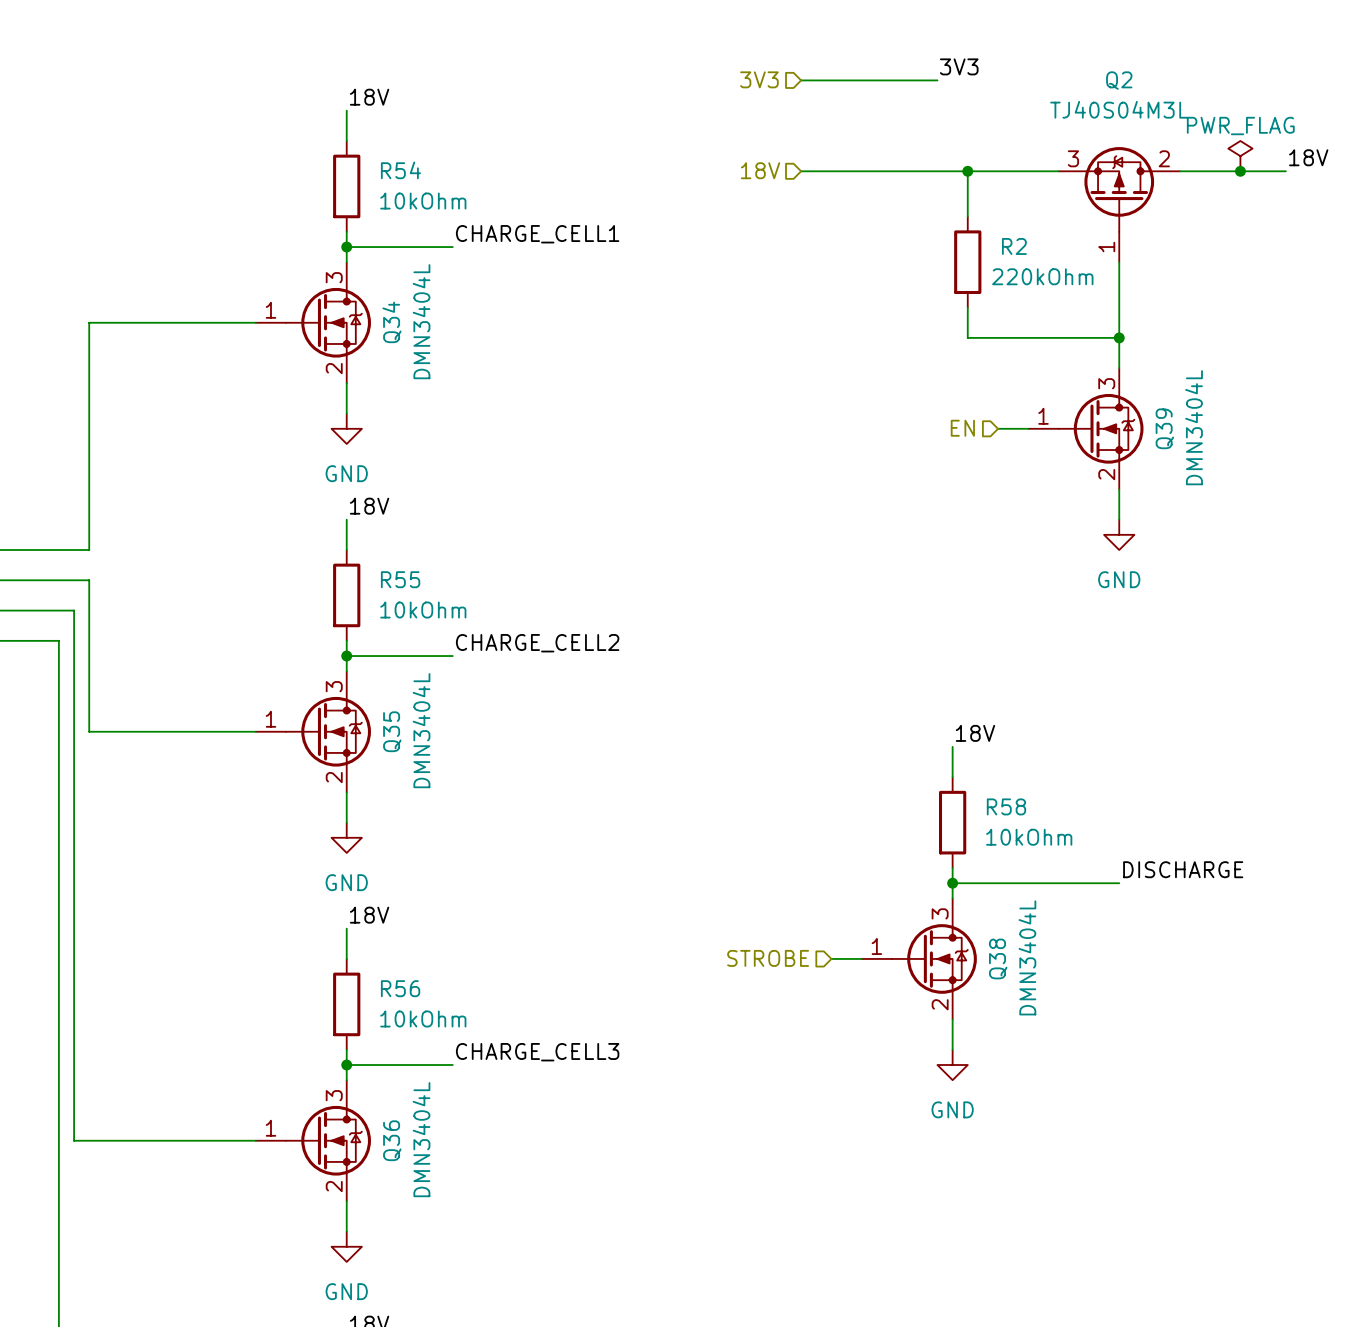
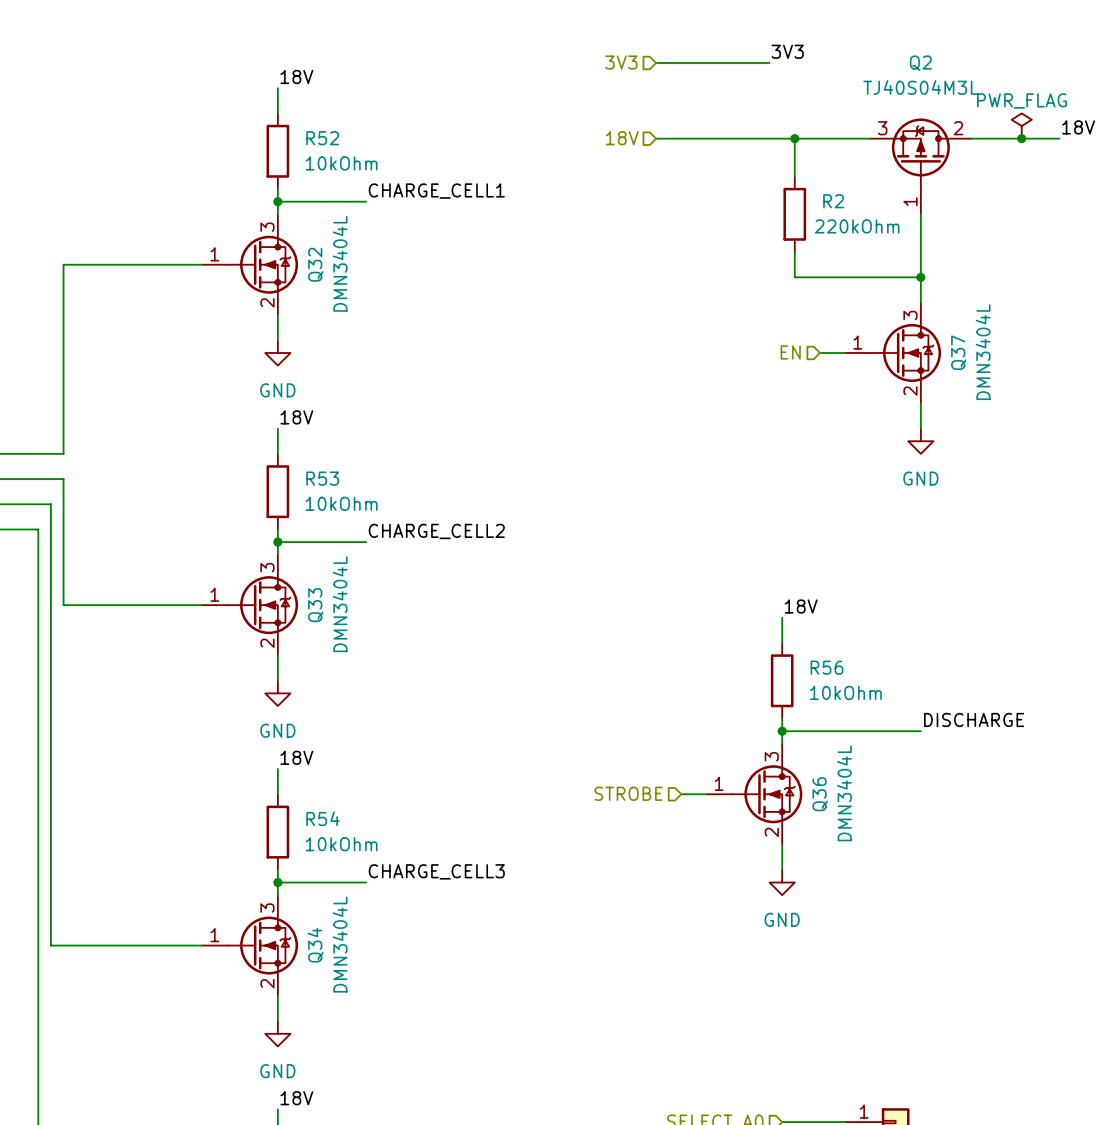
R54 name: R54 (400, 170) -> R52 (322, 138)
Q34 name: Q34 (391, 322) -> Q32 (315, 264)
Q39 name: Q39 (1164, 428) -> Q37 (958, 352)
R55 name: R55 (400, 579) -> R53 (322, 478)
Q35 name: Q35 (392, 731) -> Q33 (315, 605)
R58 name: R58 (1006, 806) -> R56 (827, 667)
Q38 name: Q38 (998, 958) -> Q36 (820, 794)
R56 name: R56 (400, 988) -> R54 (322, 818)
Q36 name: Q36 (392, 1140) -> Q34 (315, 945)

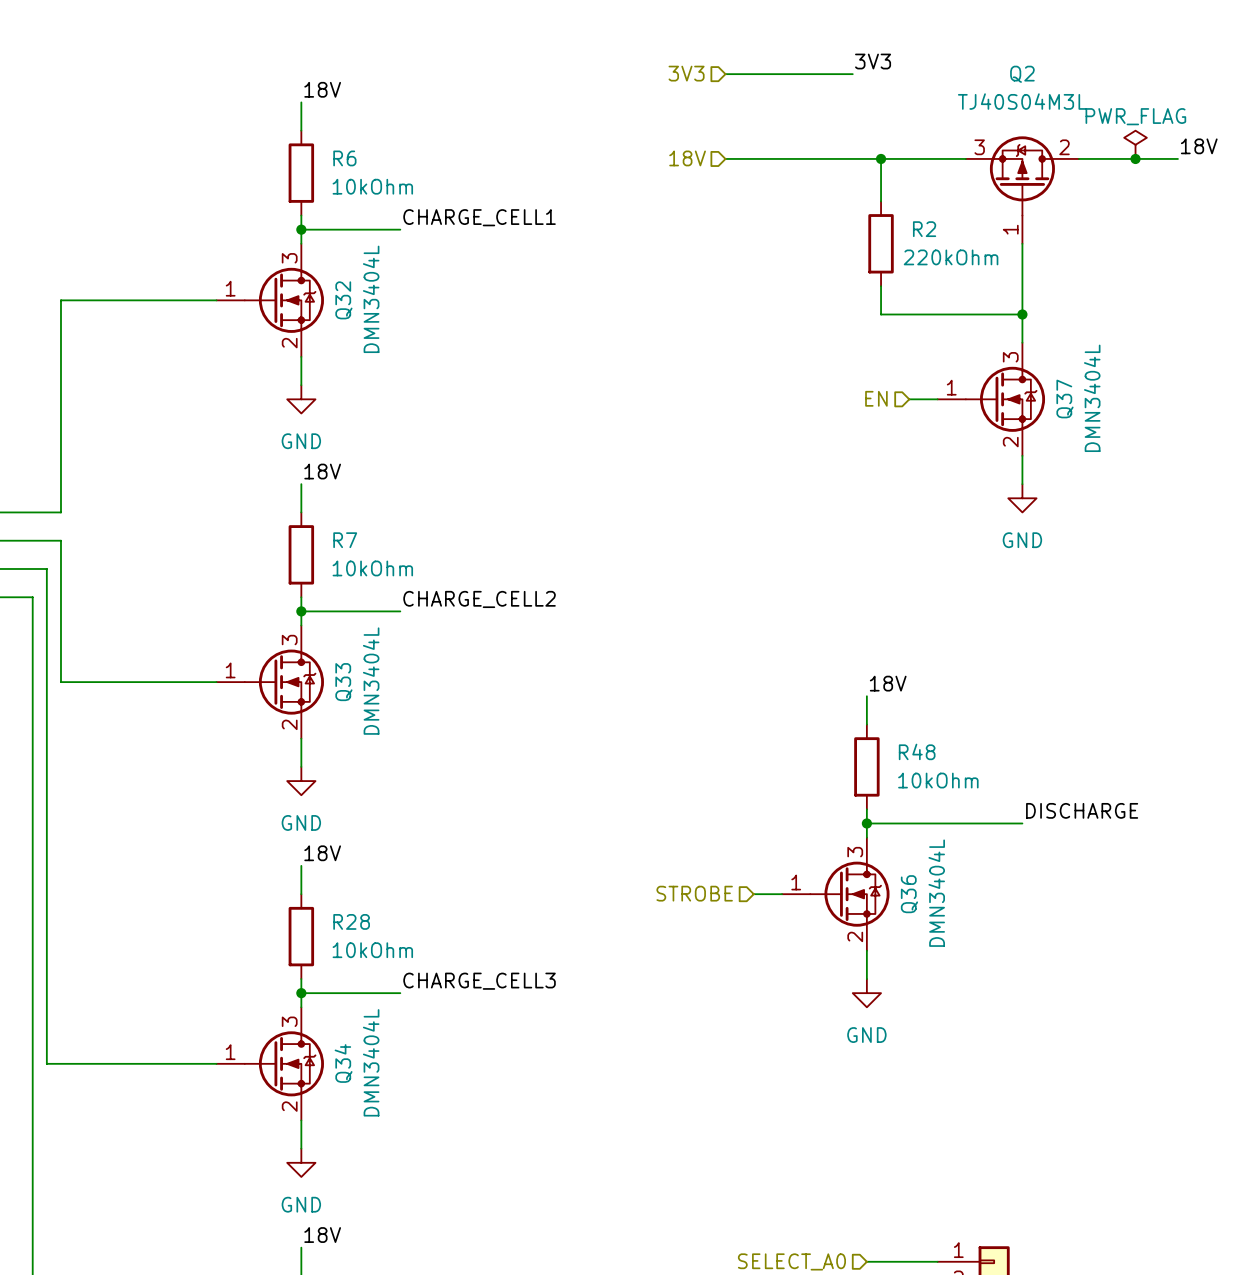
R52 name: R52 (322, 138) -> R6 (344, 158)
R53 name: R53 (322, 478) -> R7 (345, 540)
R56 name: R56 (827, 667) -> R48 (917, 751)
R54 name: R54 (322, 818) -> R28 (351, 921)

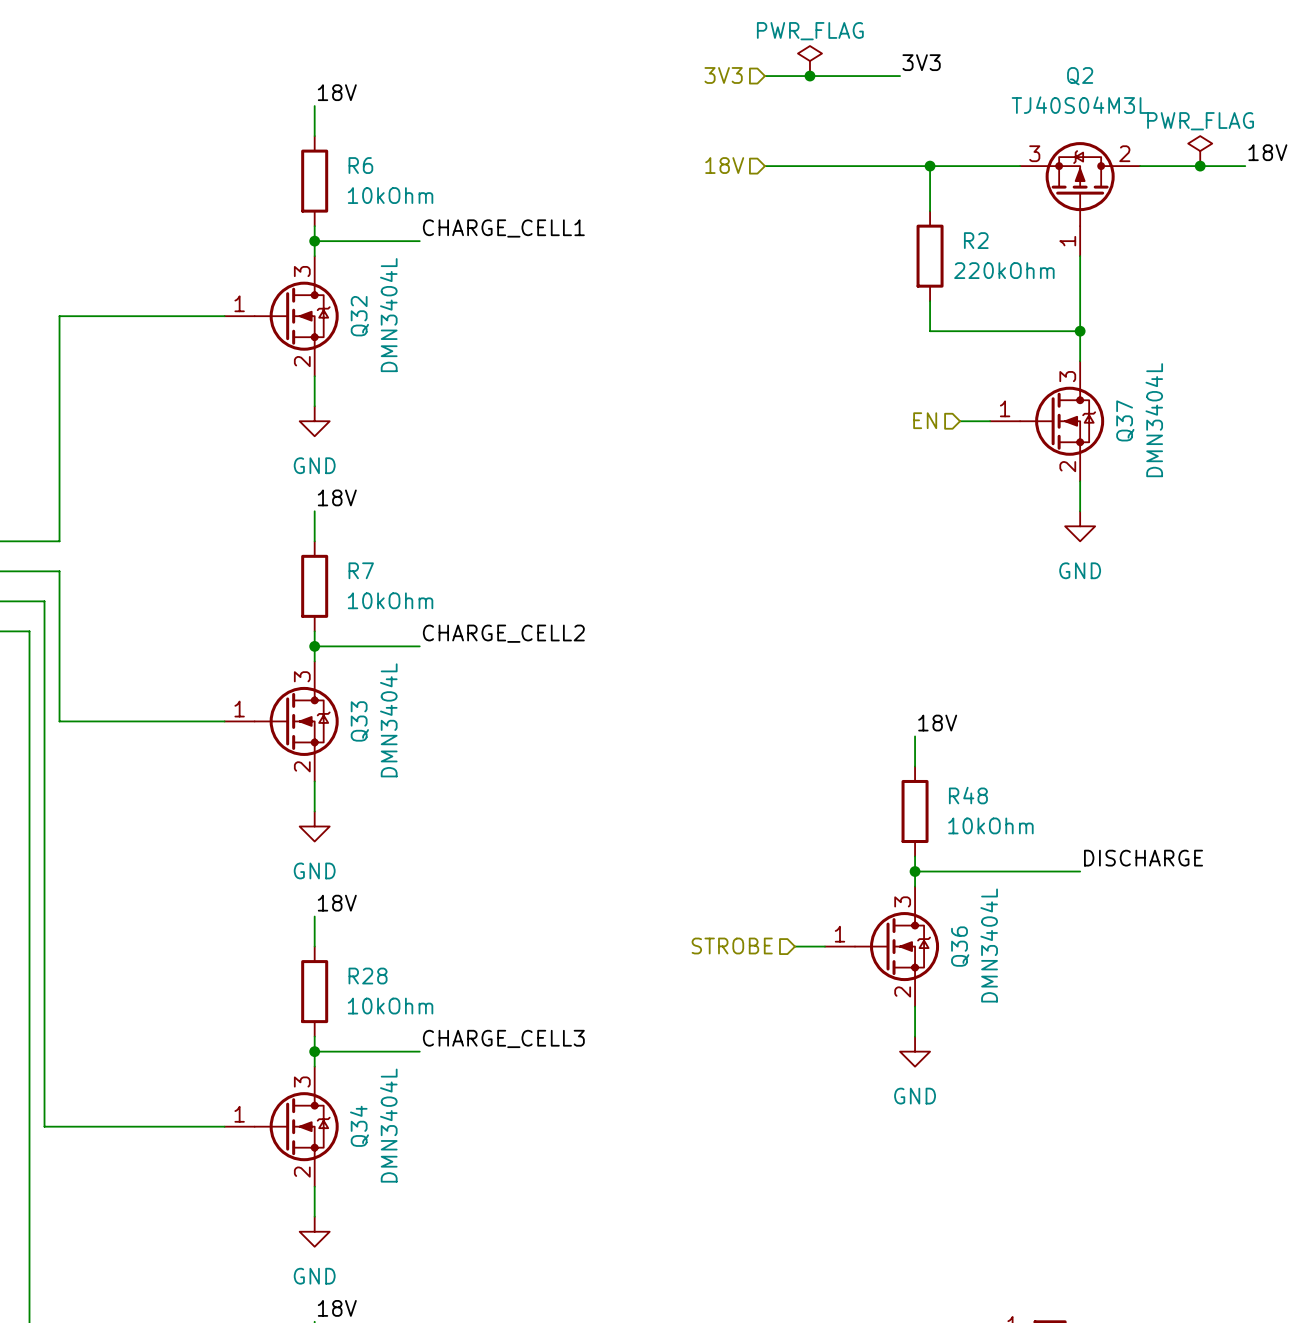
power symbol: none -> PWR_FLAG (809, 61)
junction: none -> (809, 76)

